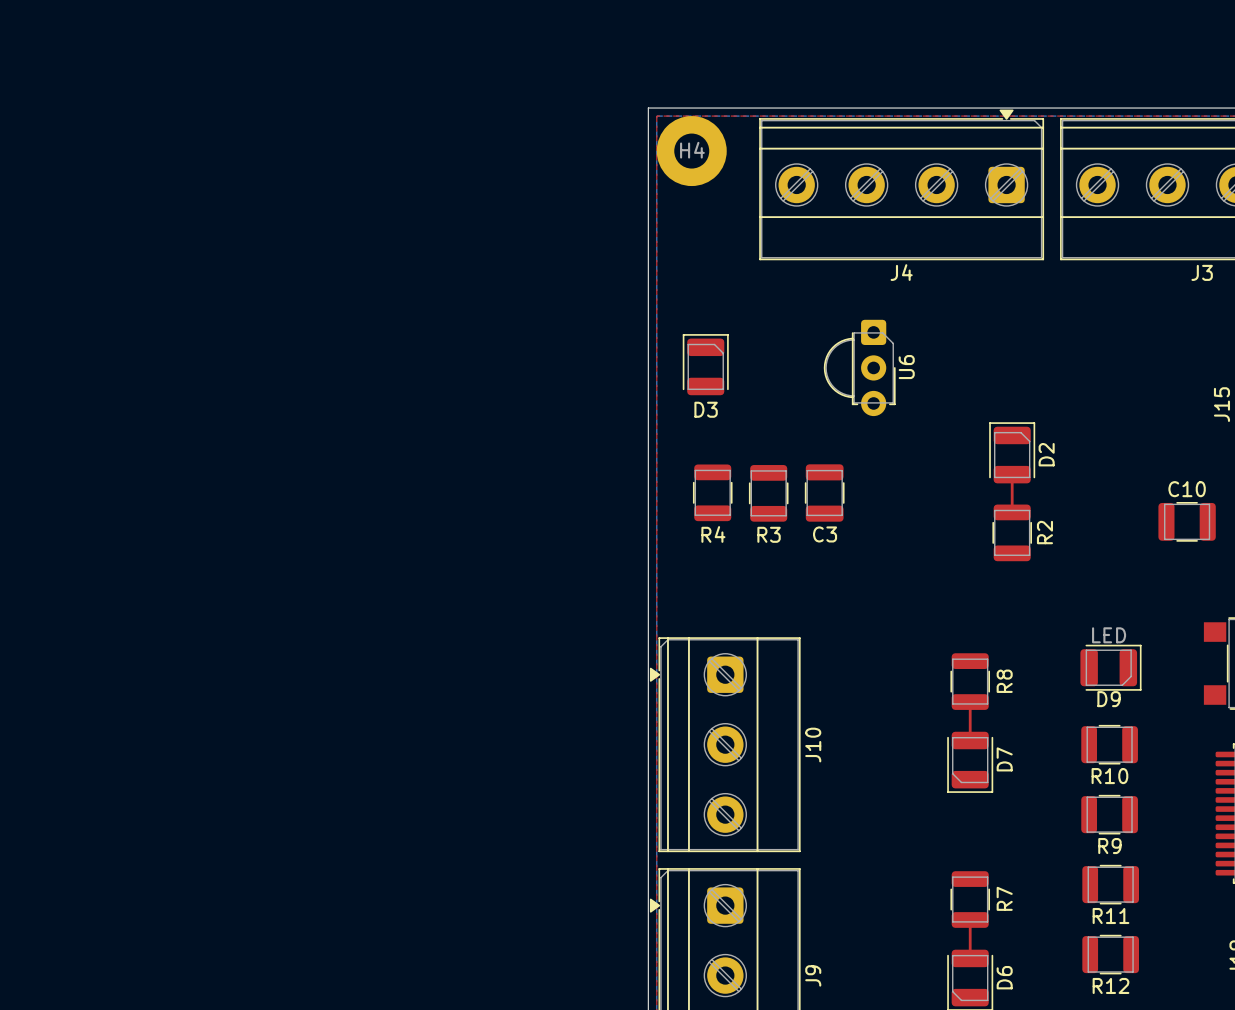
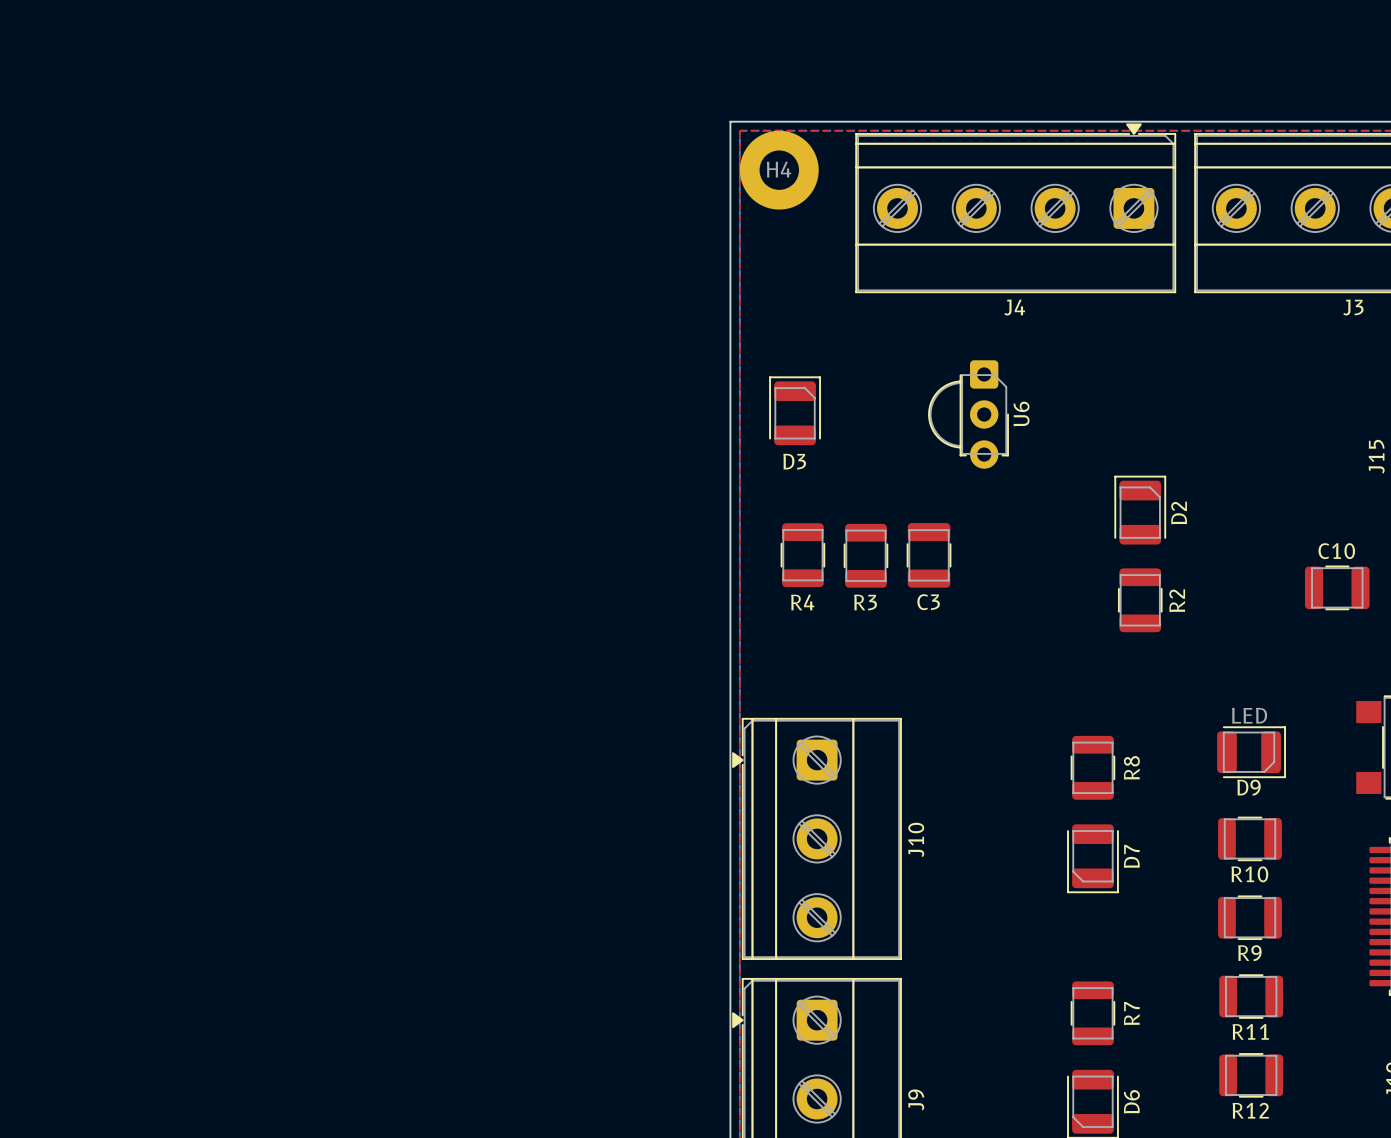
top track: (1012, 474) (1012, 512) -> none
top track: (970, 702) (970, 740) -> none
top track: (970, 919) (970, 958) -> none

